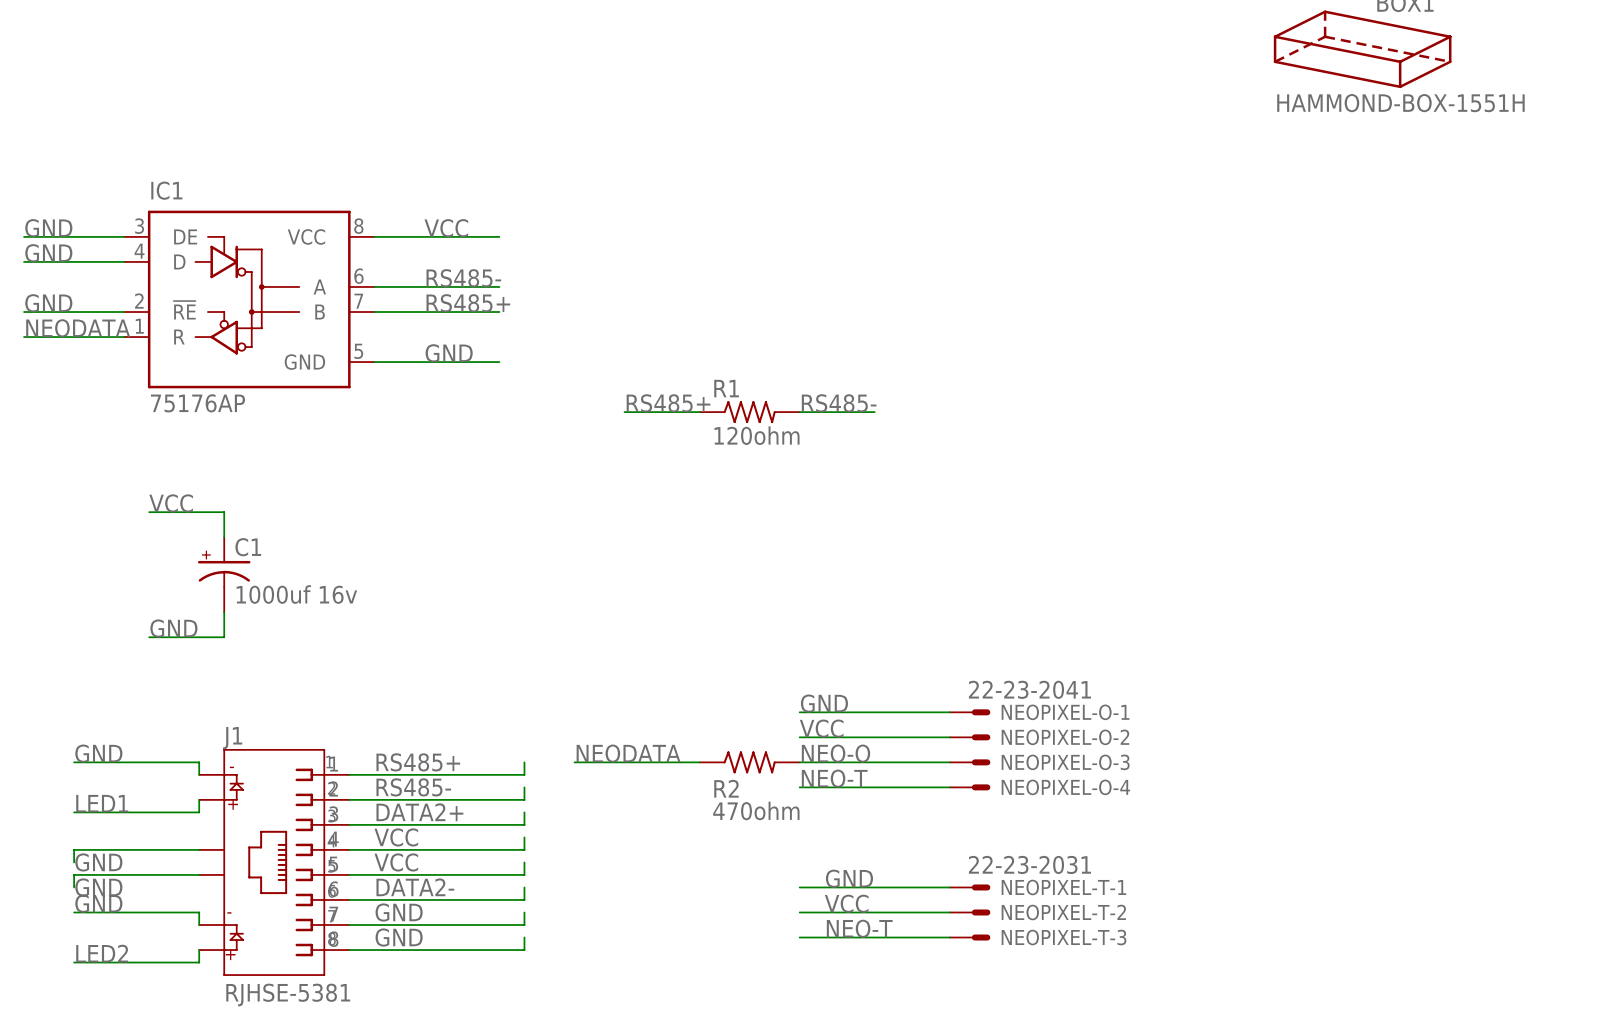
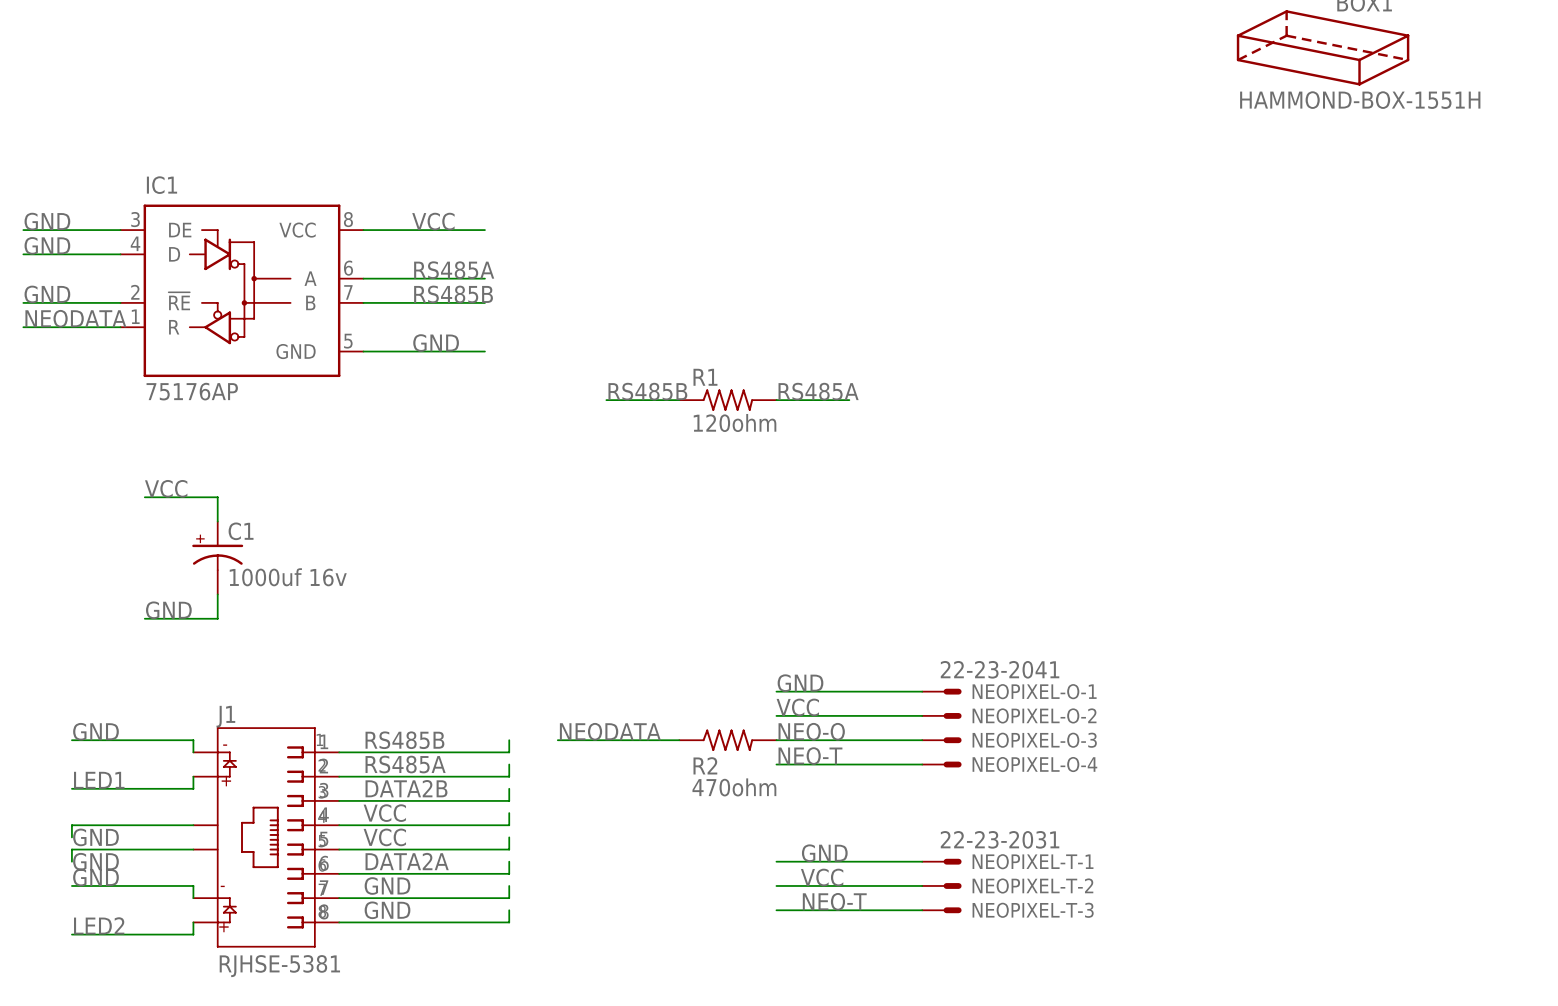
label: RS485- (463, 278) -> RS485A (454, 270)
label: RS485+ (468, 303) -> RS485B (453, 294)
label: RS485+ (668, 403) -> RS485B (647, 391)
label: RS485- (839, 403) -> RS485A (818, 391)
label: RS485+ (418, 762) -> RS485B (404, 740)
label: RS485- (413, 787) -> RS485A (405, 764)
label: DATA2+ (419, 812) -> DATA2B (406, 788)
label: DATA2- (415, 887) -> DATA2A (407, 861)

